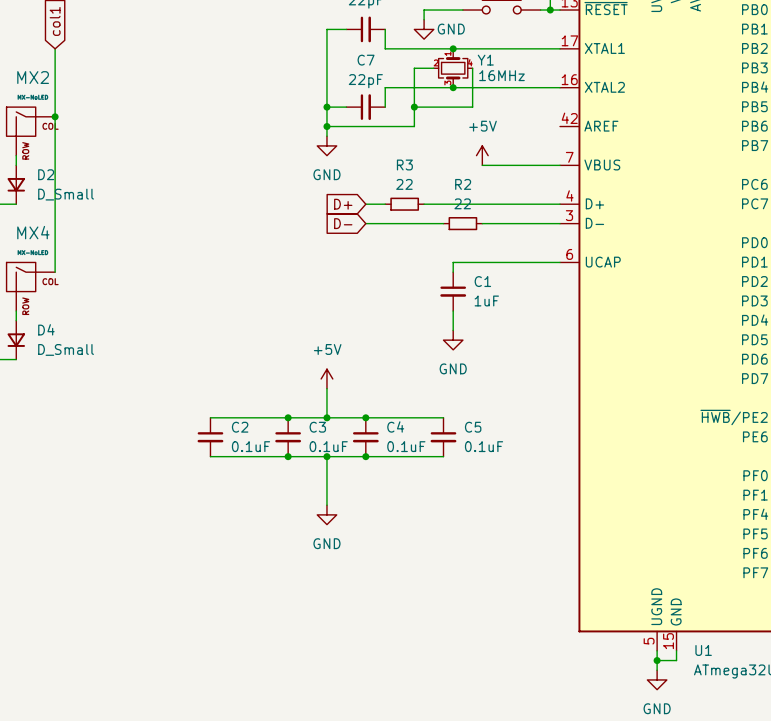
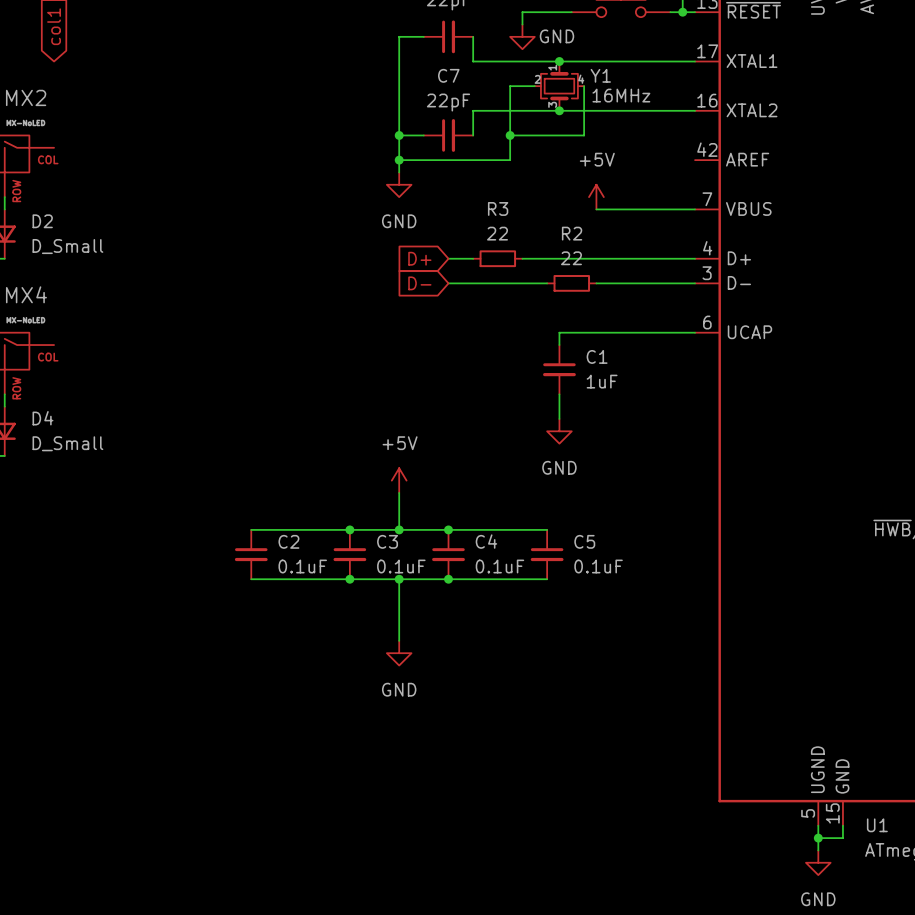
wire: (55, 48) (55, 272) -> none
junction: (55, 116) -> none

